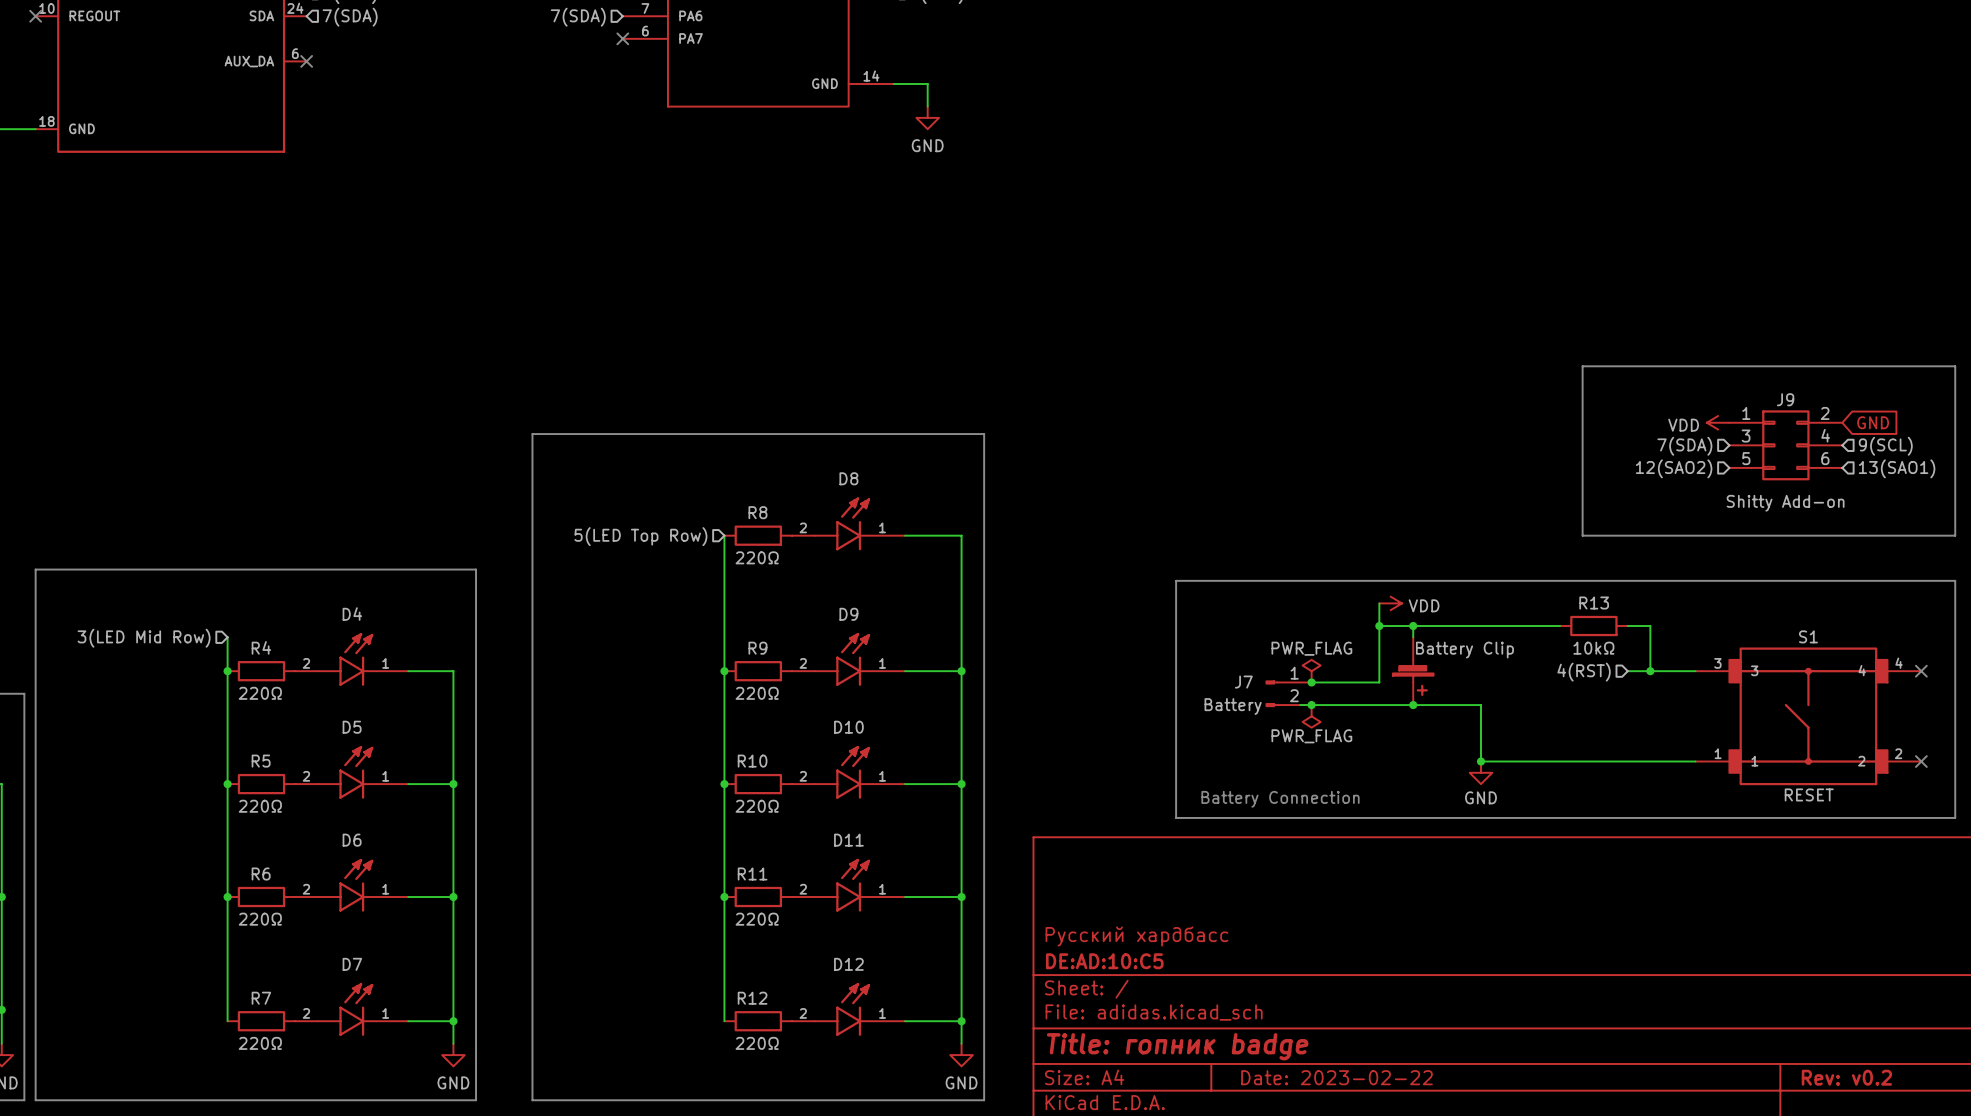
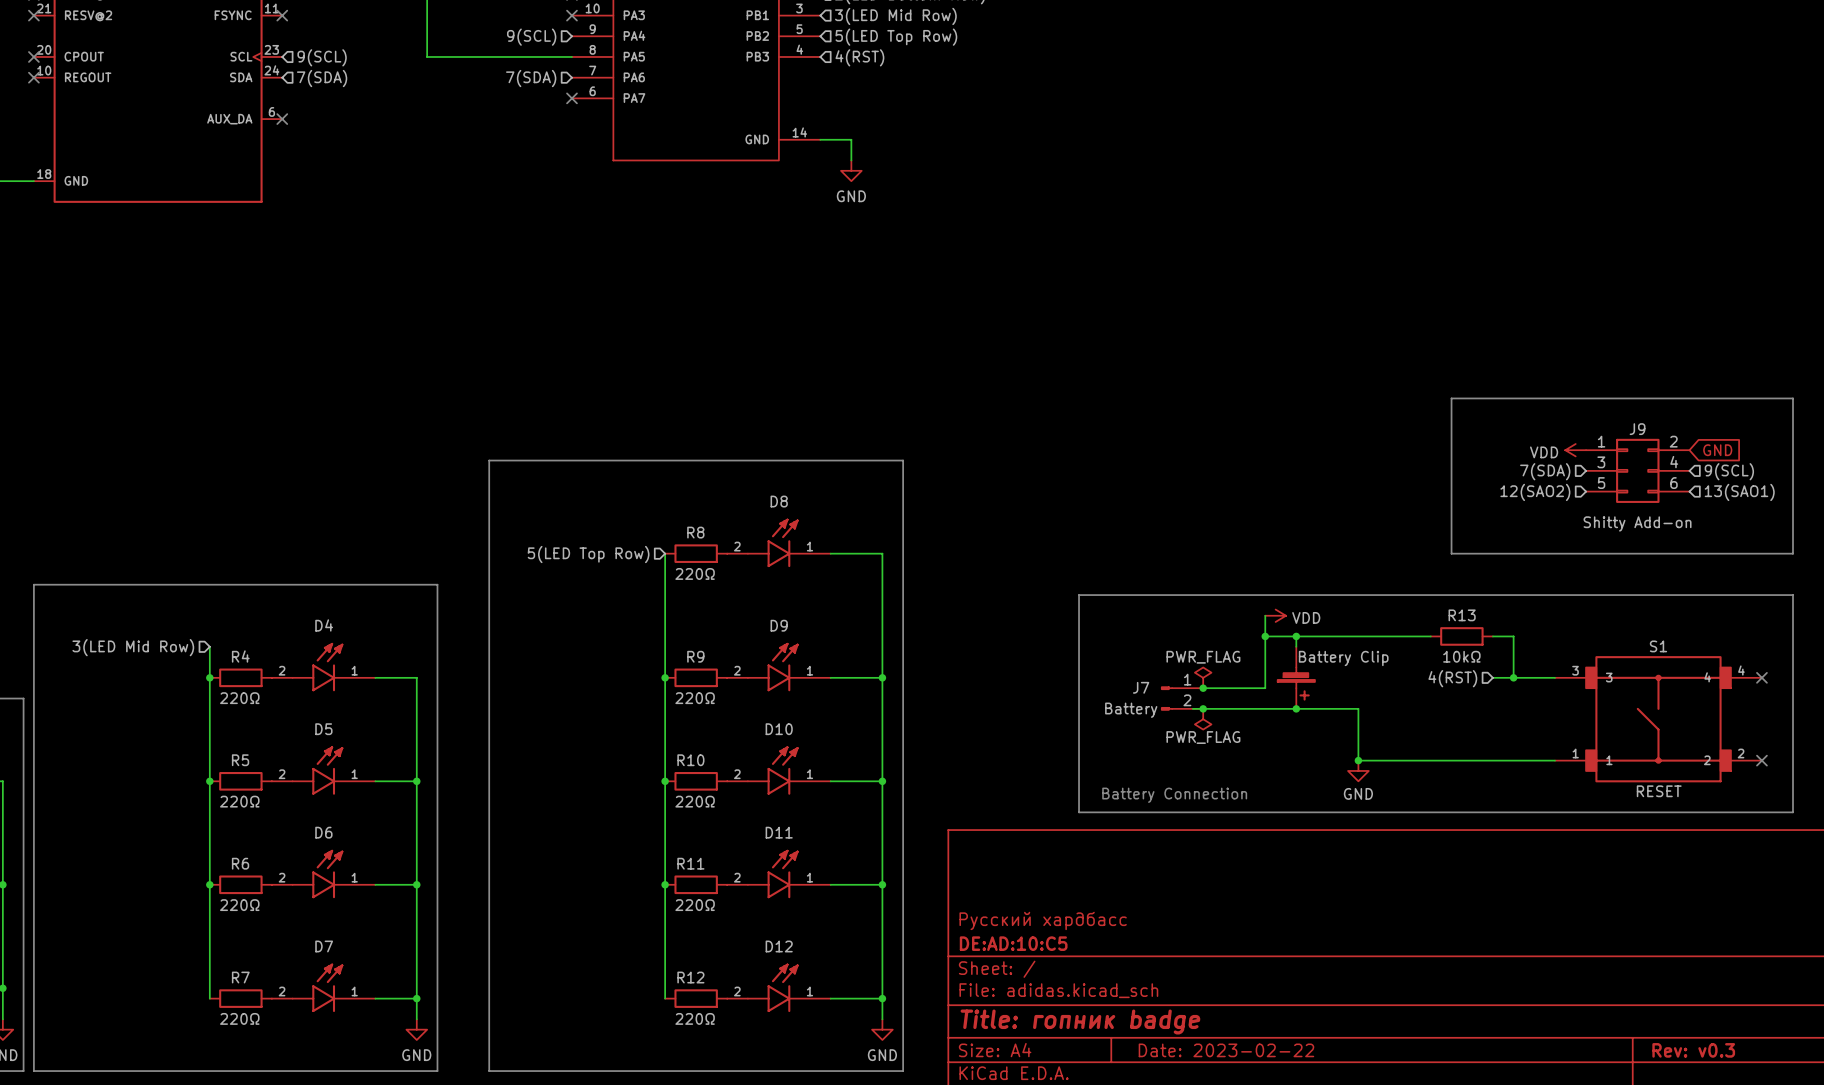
title block: Rev: v0.2 (1846, 1077) -> Rev: v0.3 (1693, 1050)

